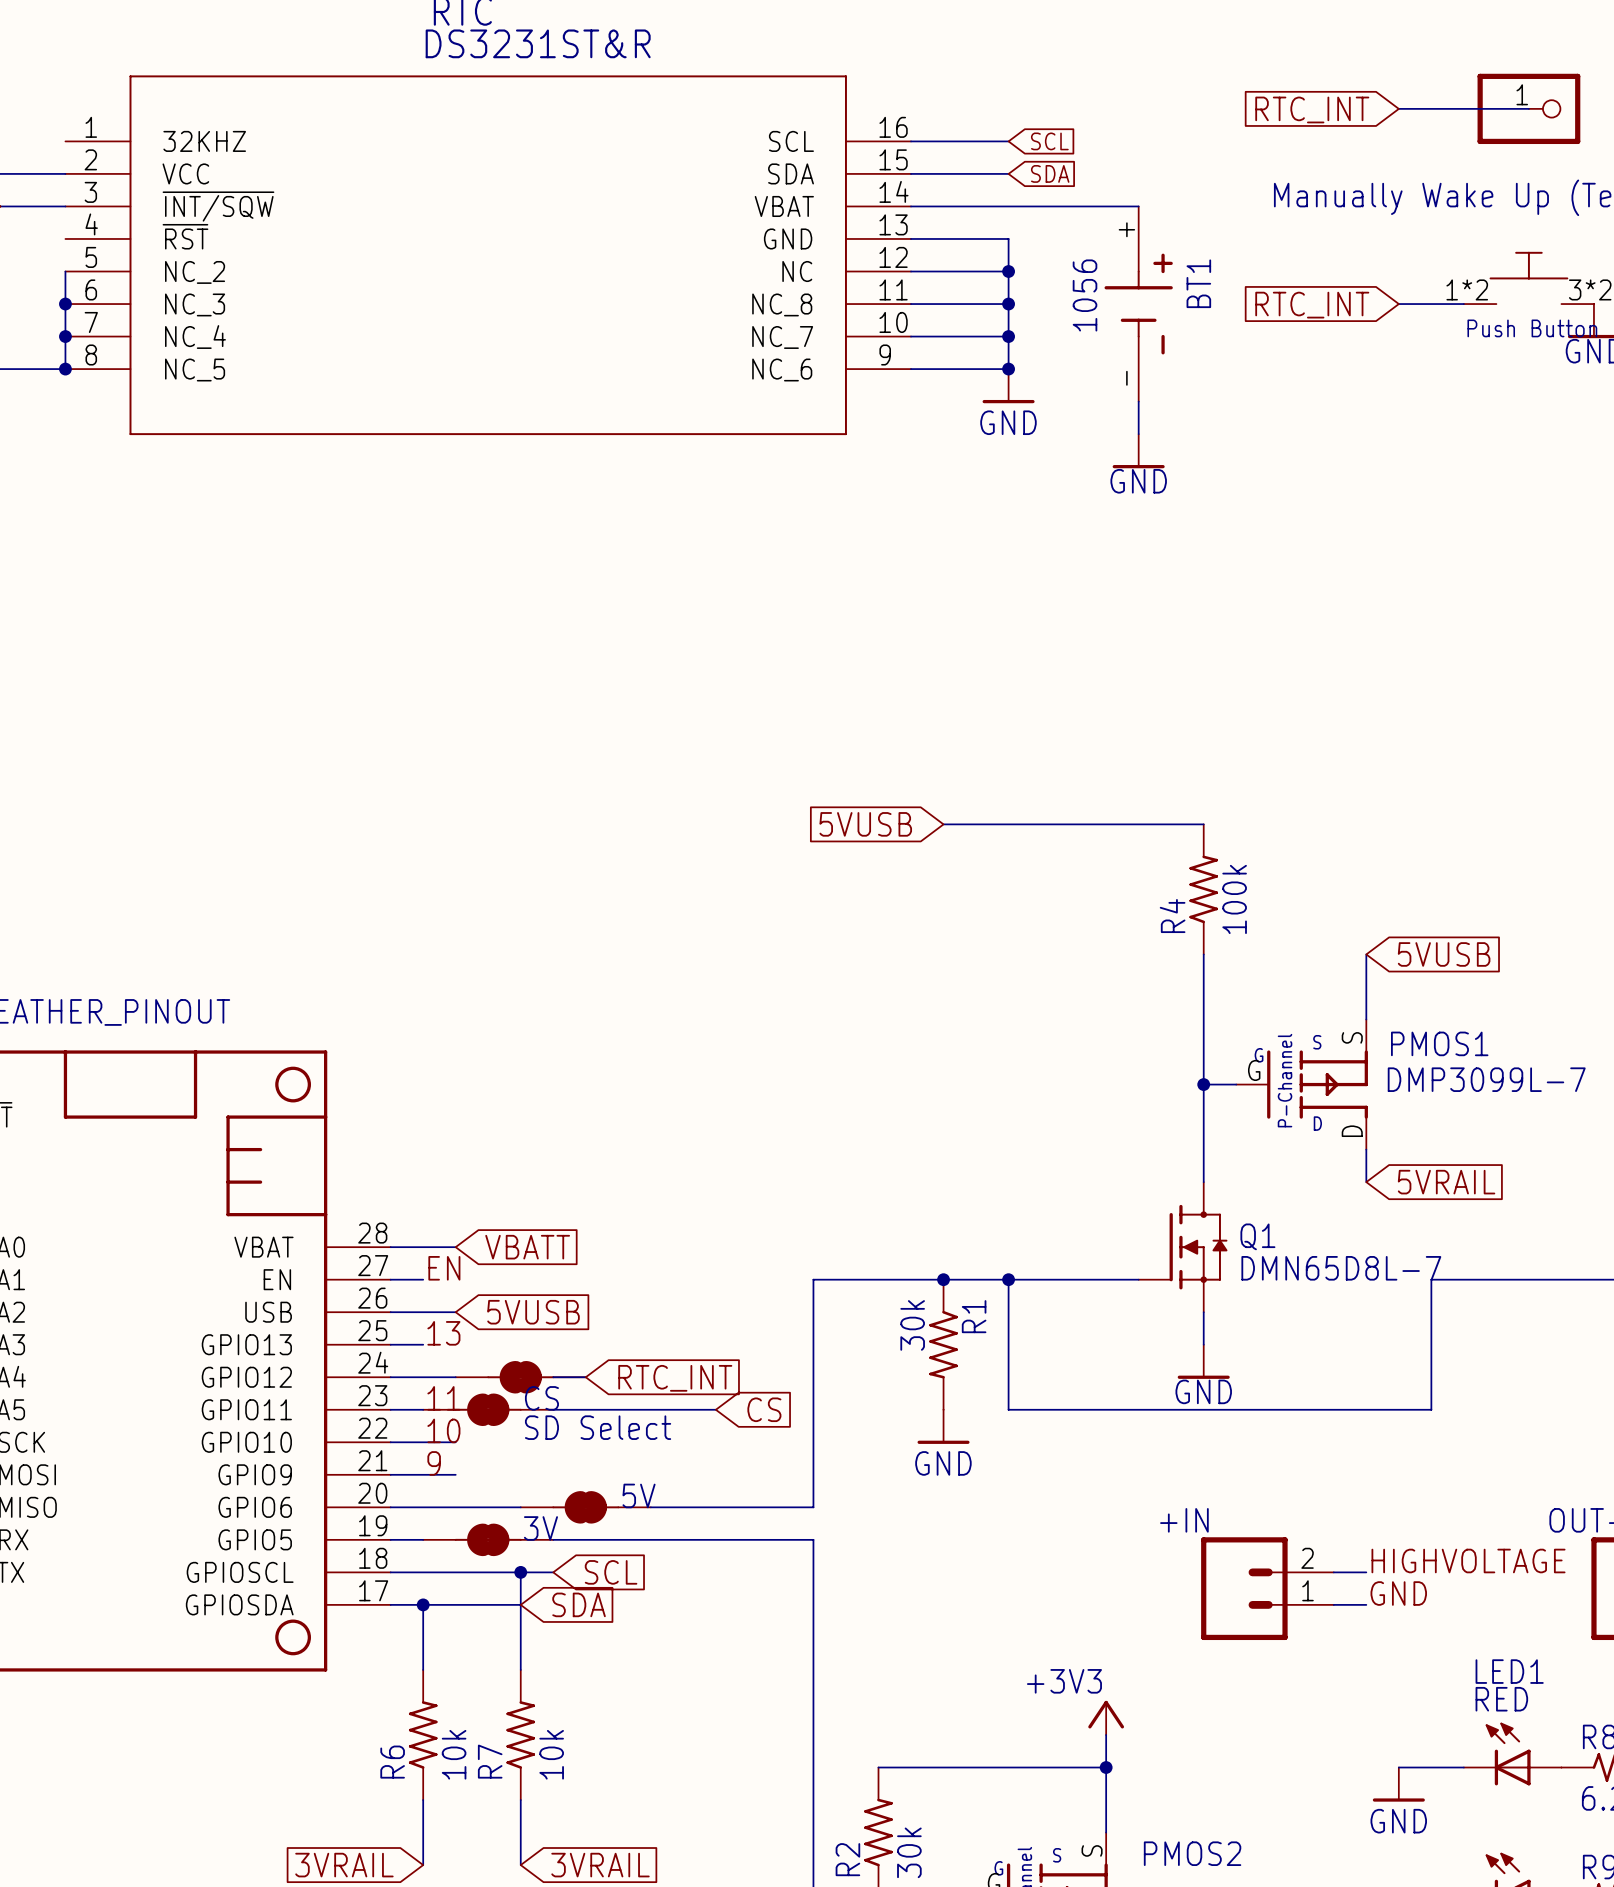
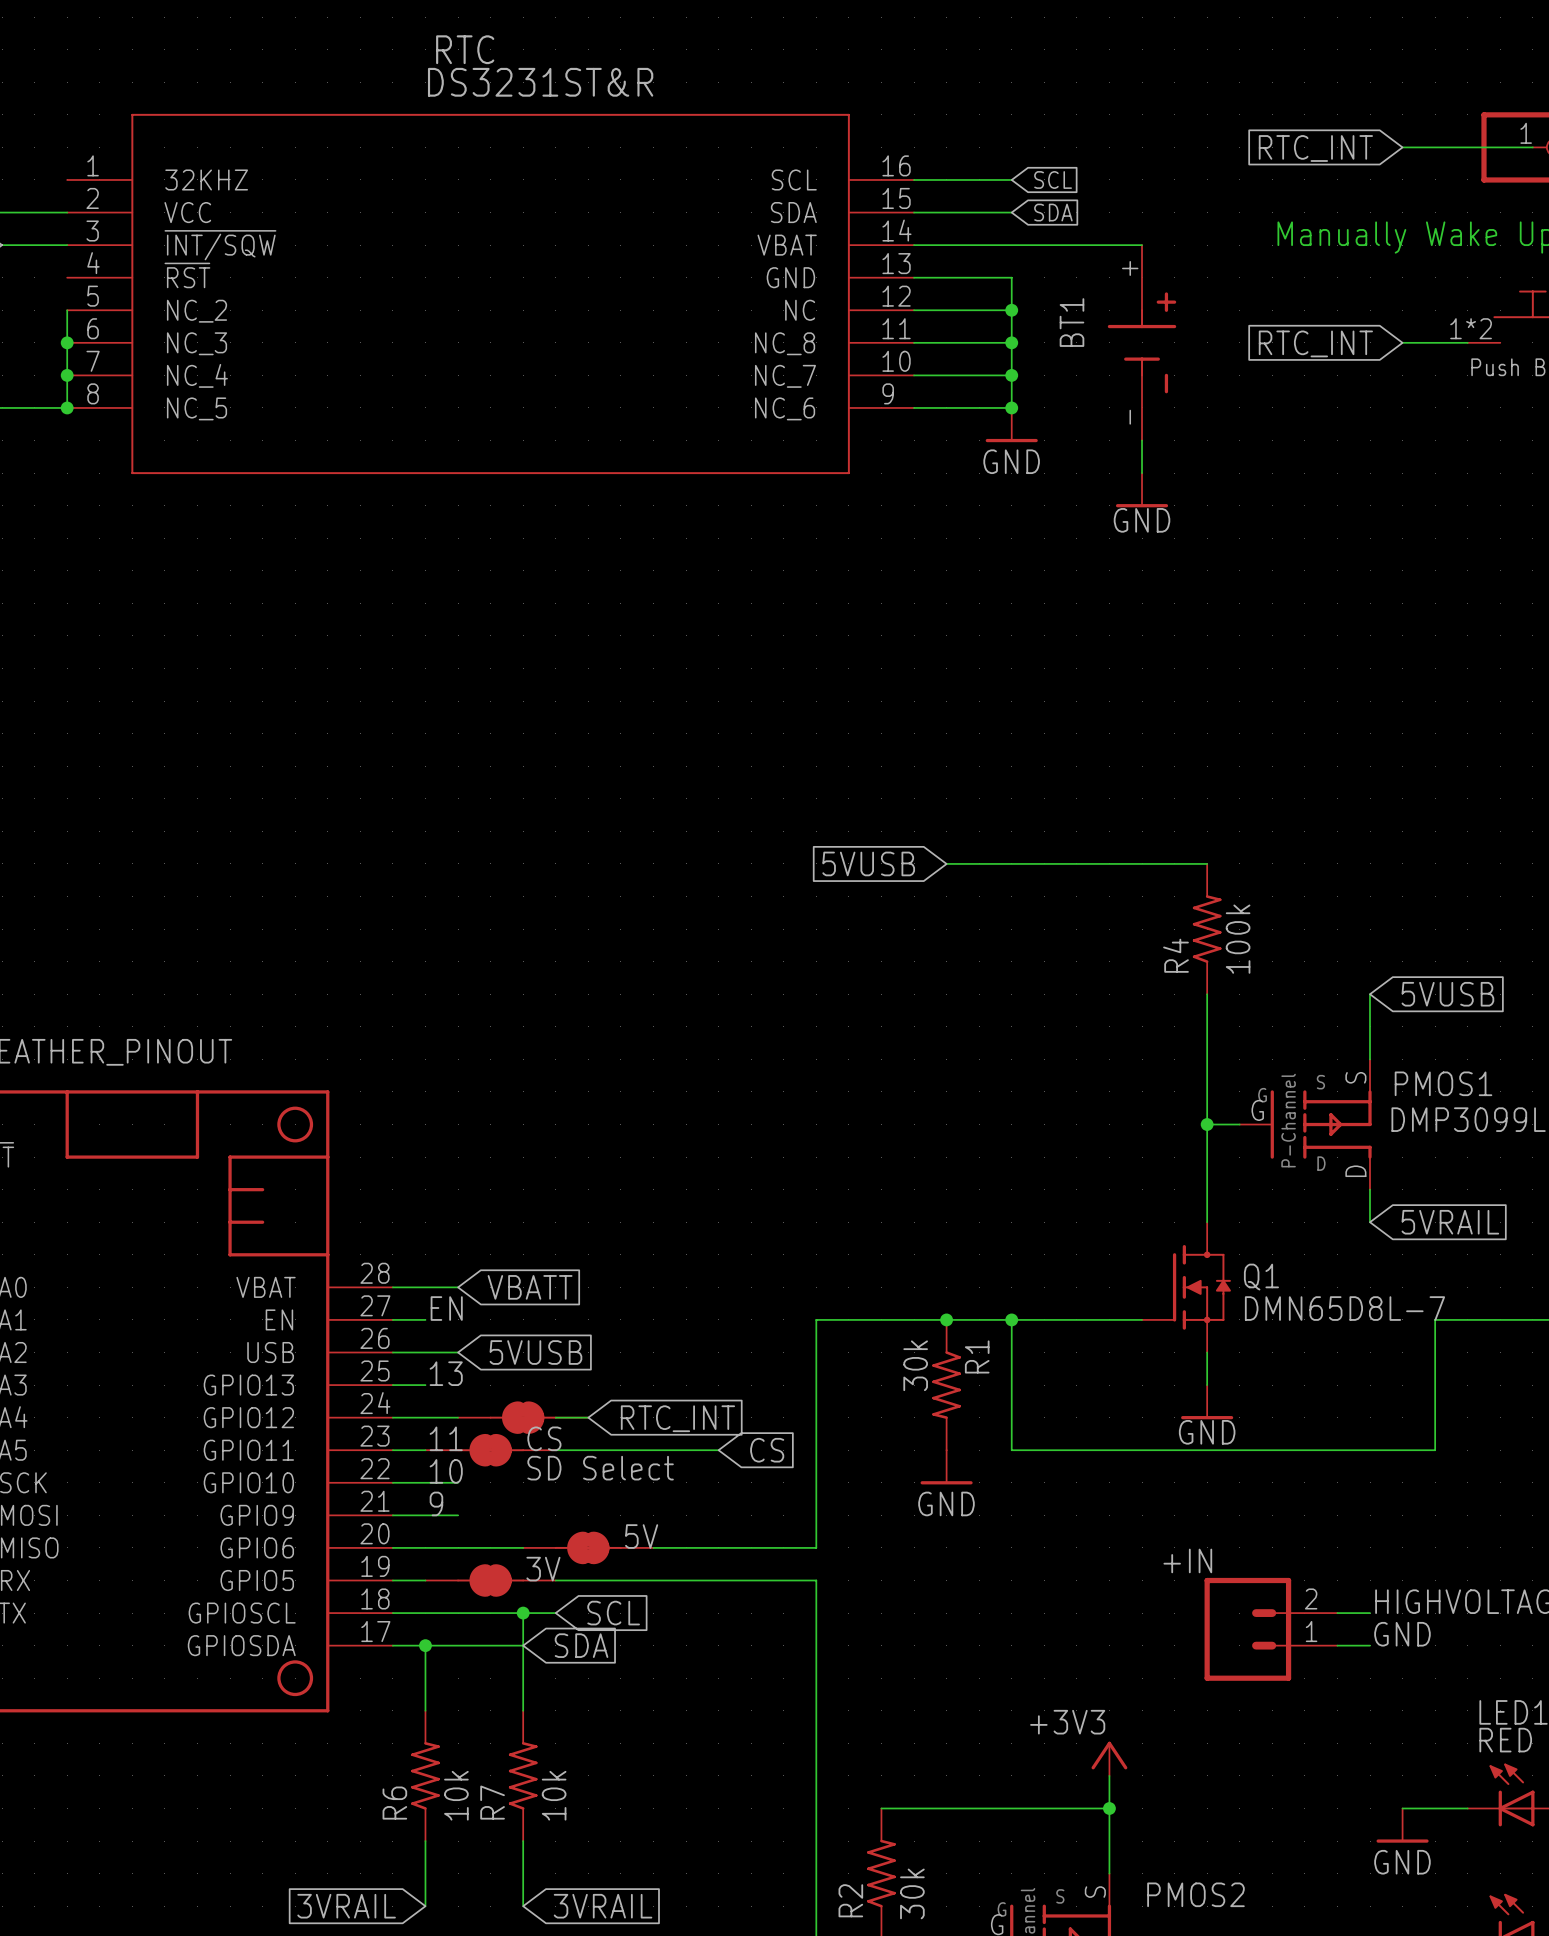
BT1 name position: BT1 (1198, 283) -> BT1 (1071, 322)
BT1 value: 1056 (1085, 295) -> none

